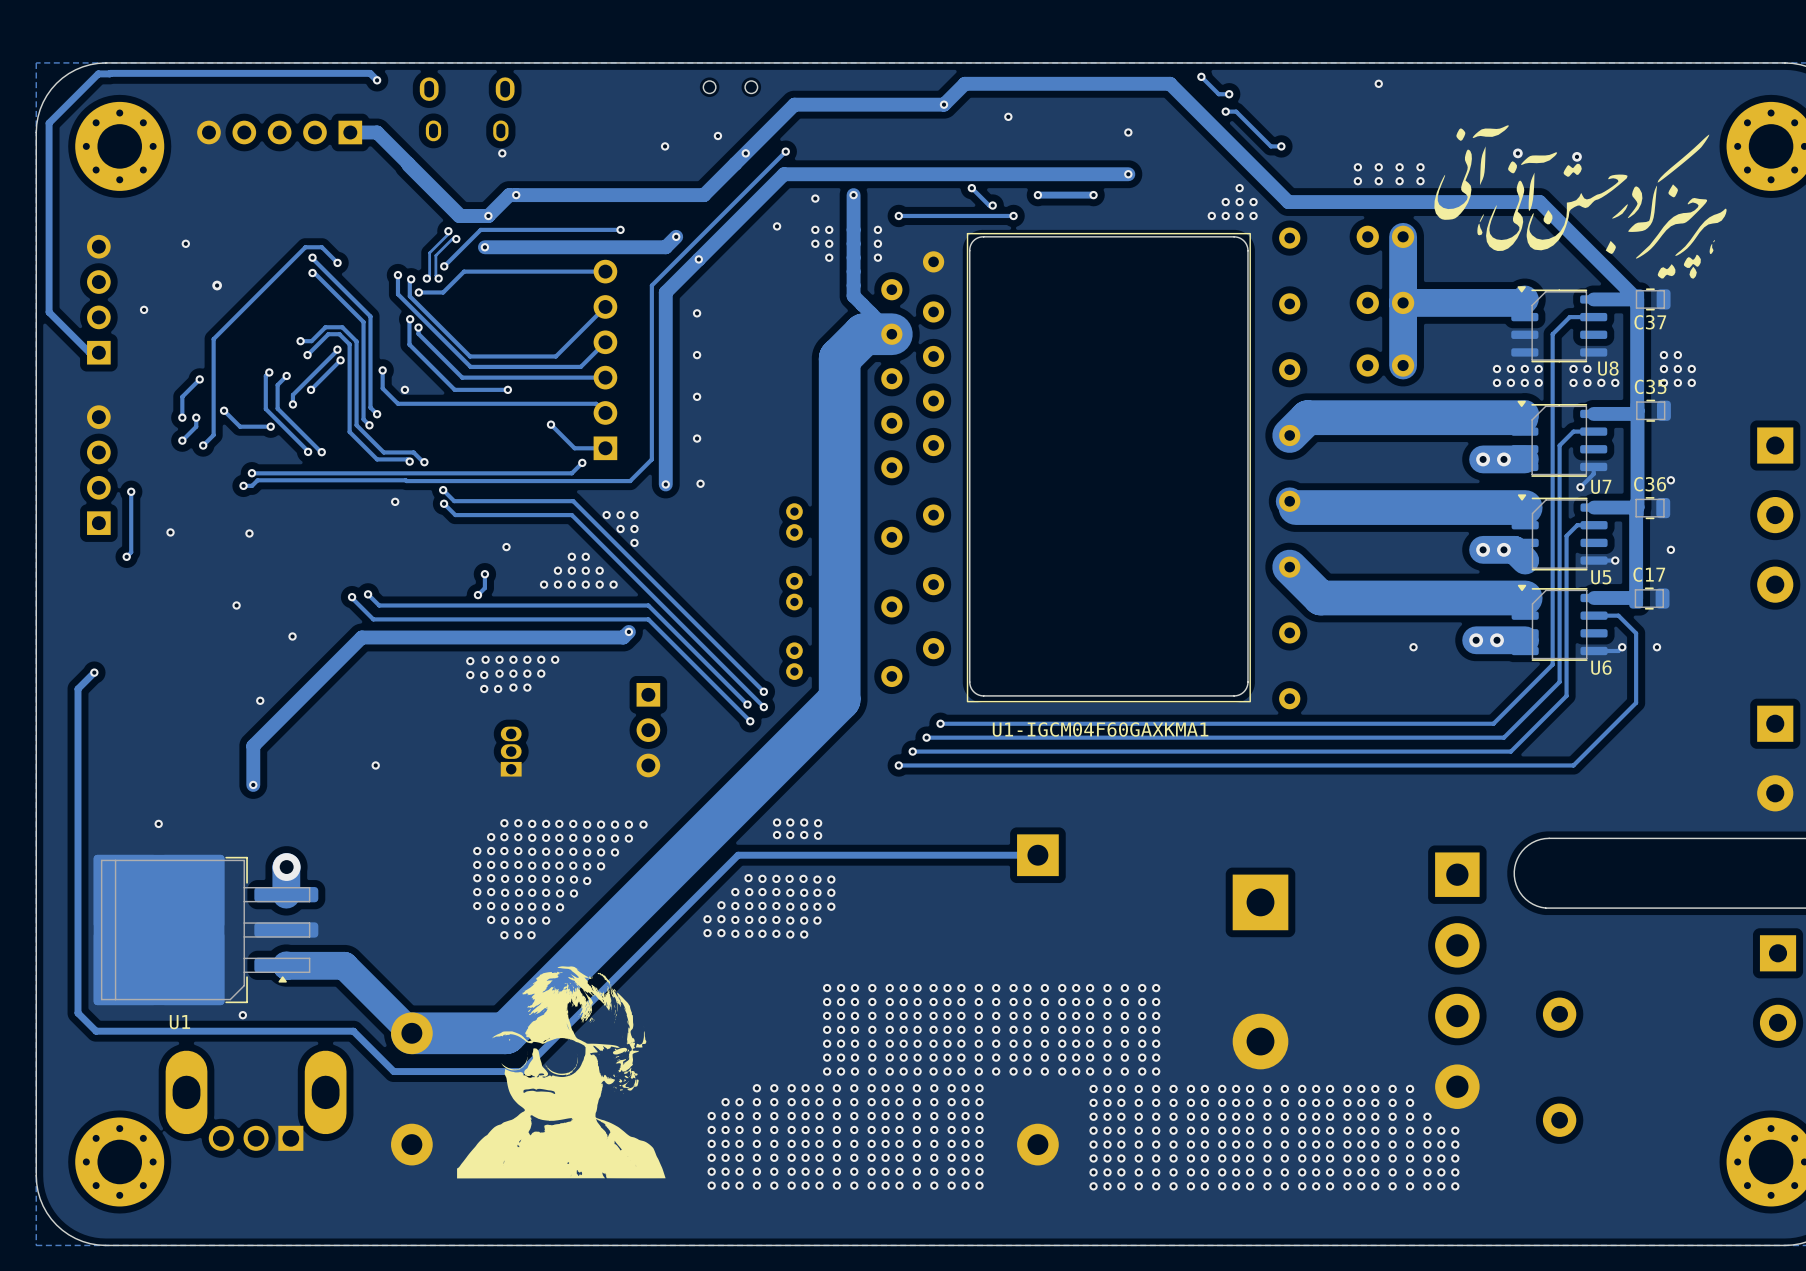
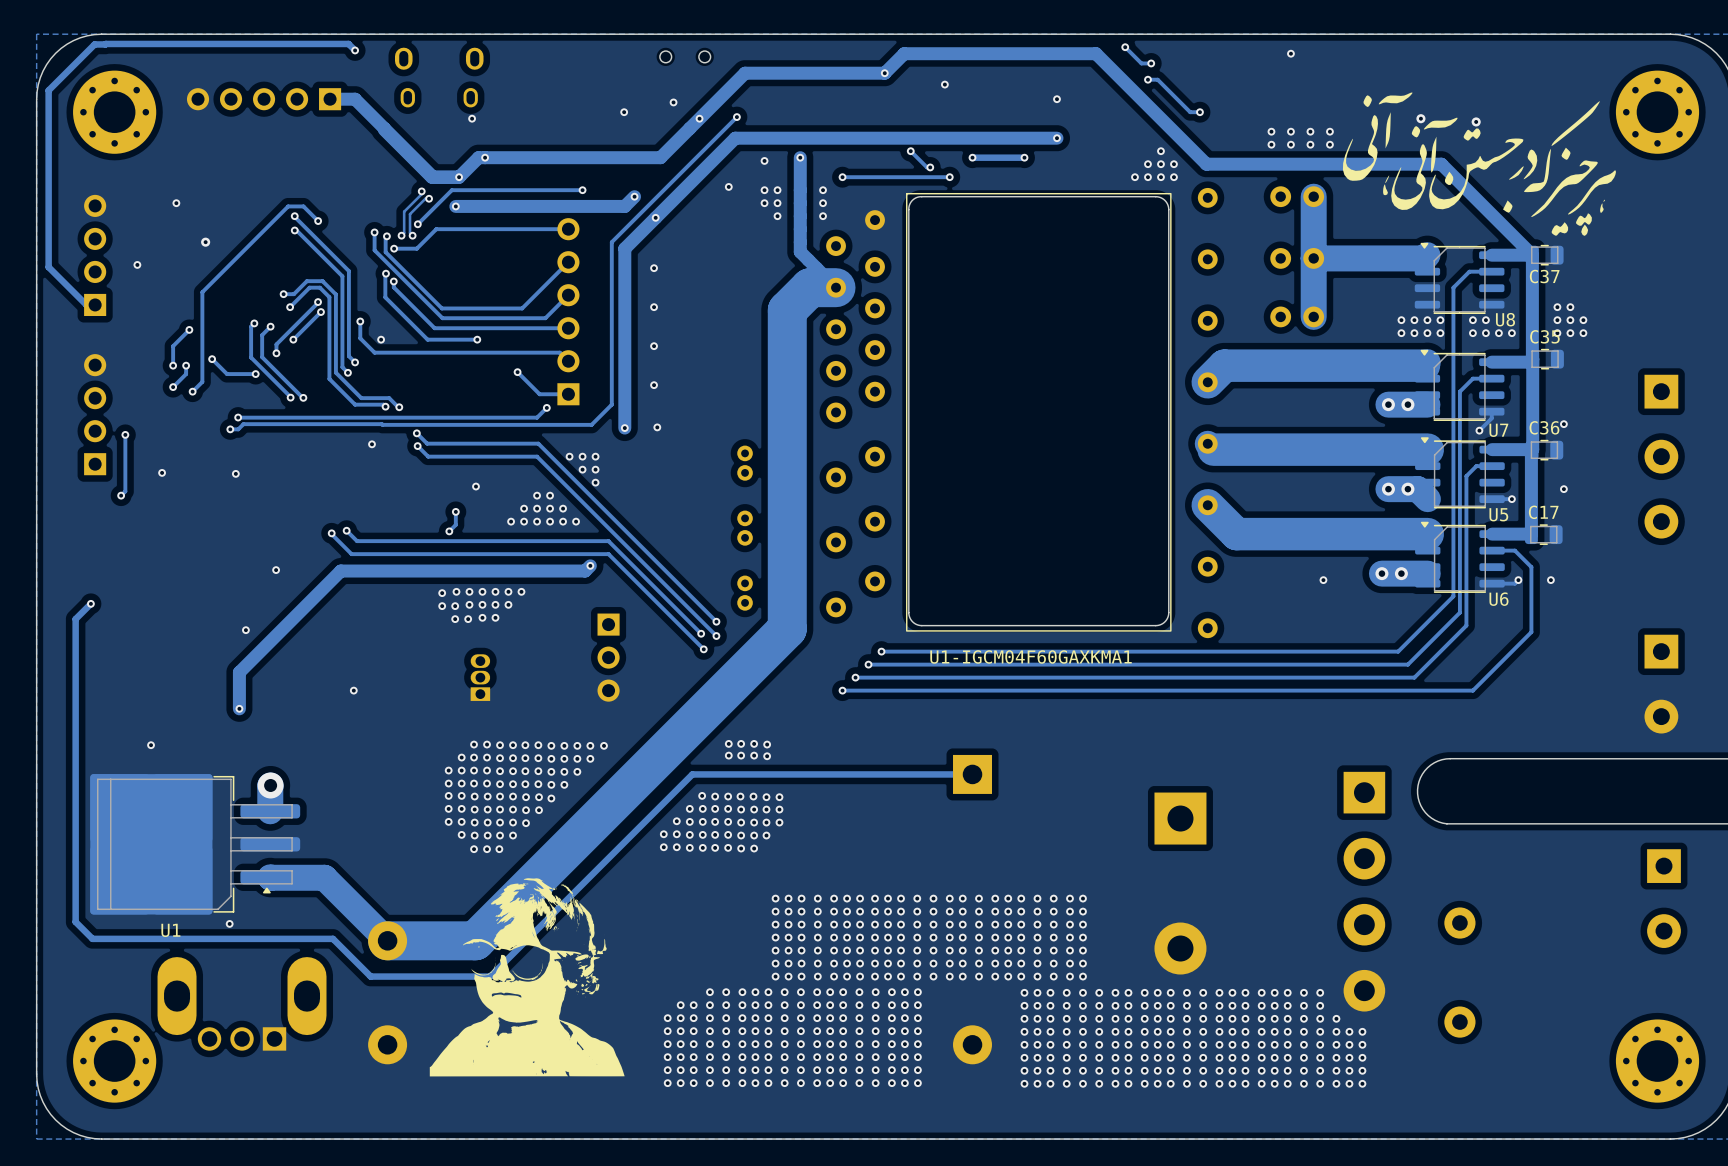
via: (236, 605) -> none

